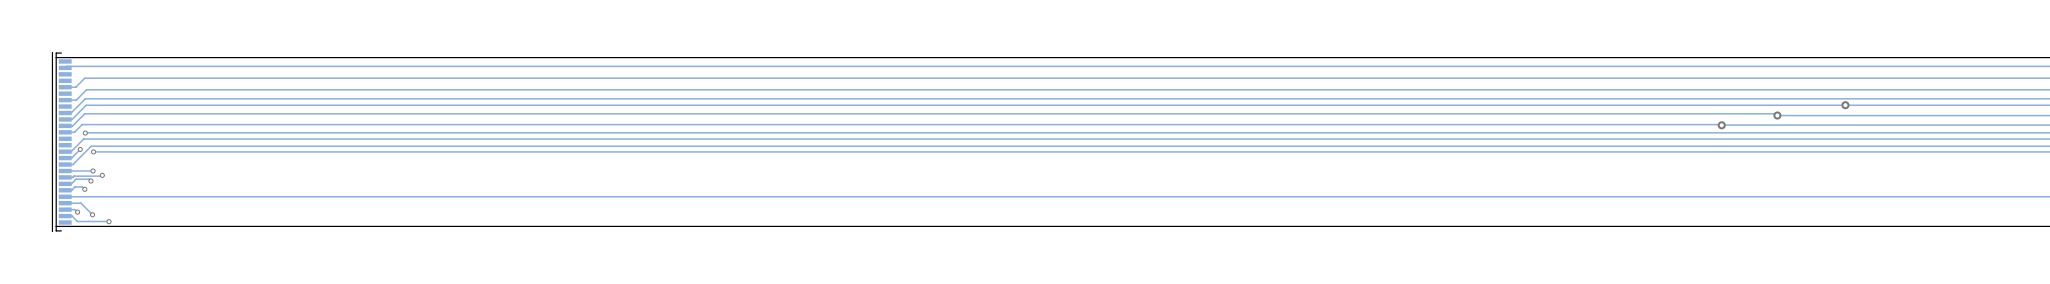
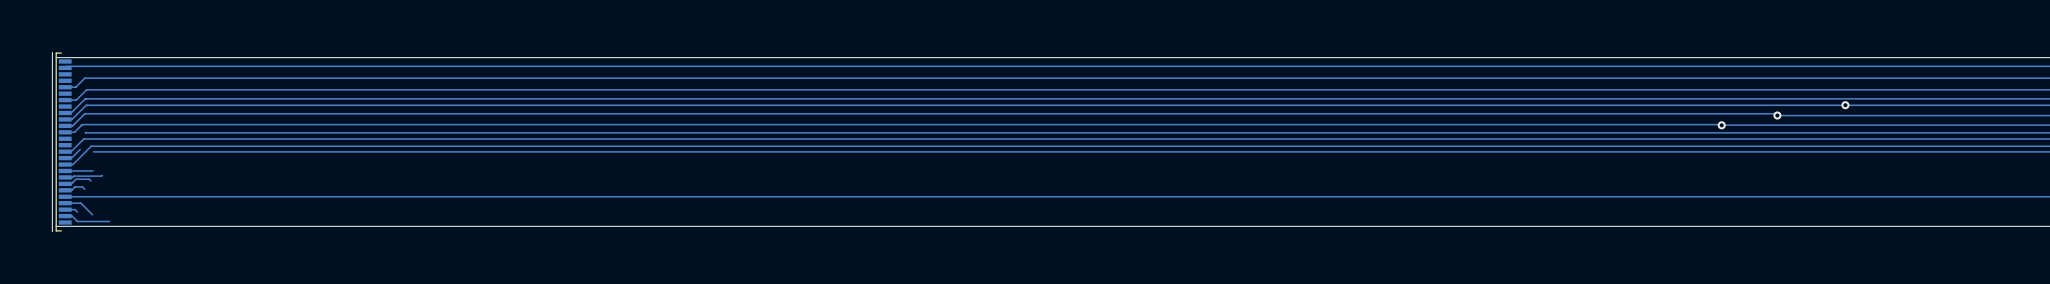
via: (85, 133) -> none
via: (80, 149) -> none
via: (93, 151) -> none
via: (93, 170) -> none
via: (102, 175) -> none
via: (90, 181) -> none
via: (84, 189) -> none
via: (77, 212) -> none
via: (92, 214) -> none
via: (109, 221) -> none

